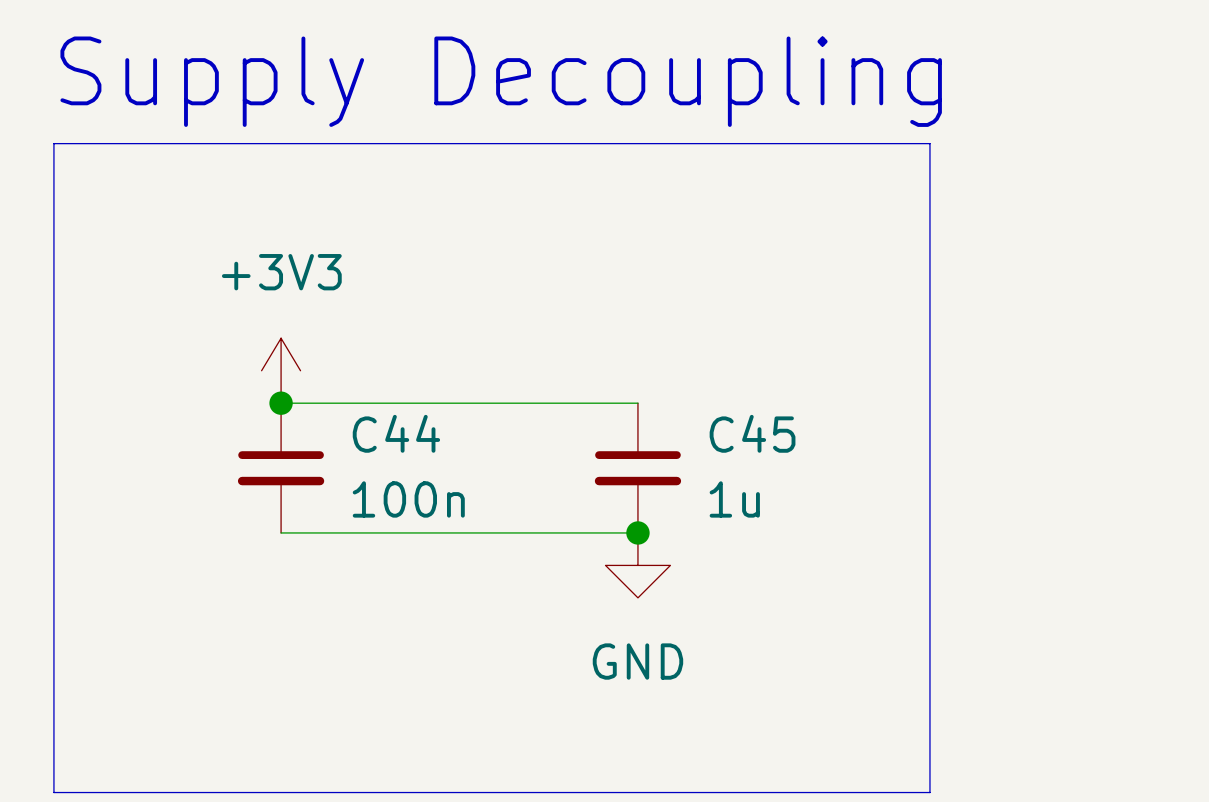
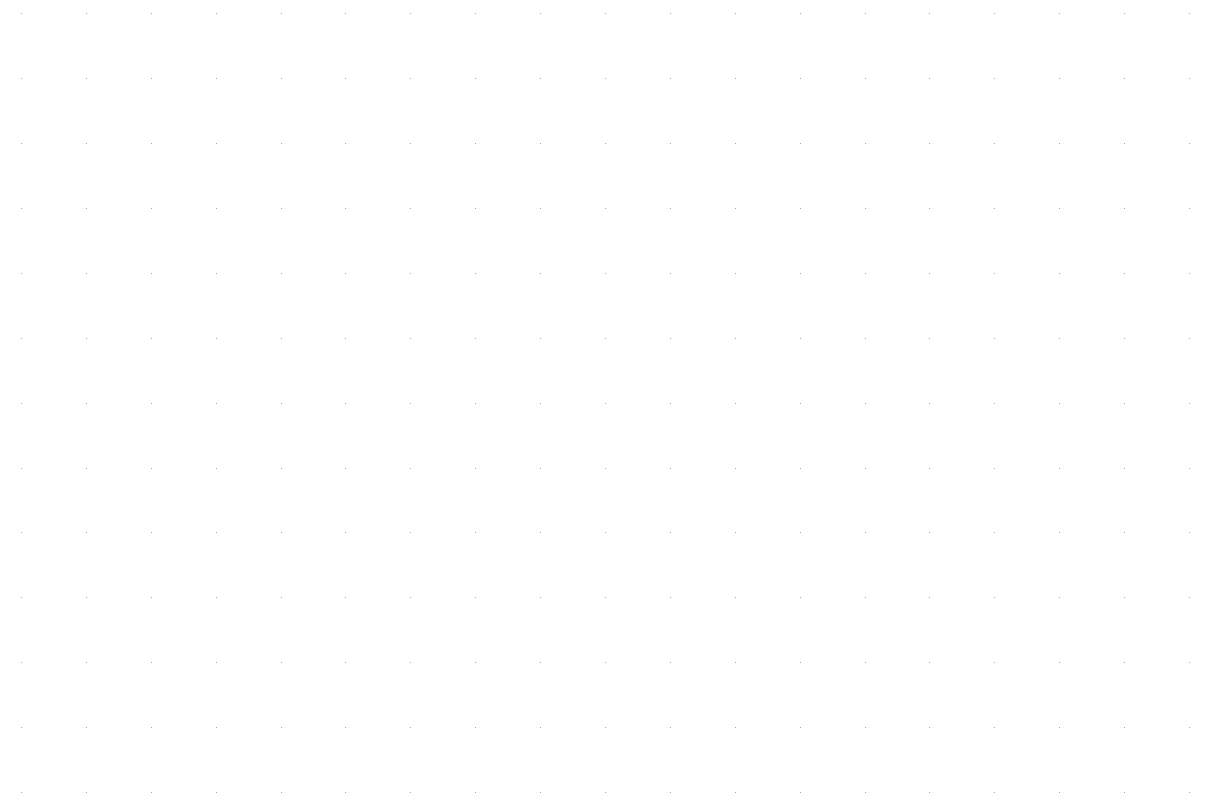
text: Supply Decoupling (501, 81) -> none
line: (53, 143) (929, 143) (929, 792) (53, 792) (53, 143) -> none
power symbol: +3V3 (281, 370) -> none
wire: (281, 403) (637, 403) -> none
junction: (281, 403) -> none
C44: 100n (281, 468) -> none
C45: 1u (637, 468) -> none
wire: (281, 532) (637, 532) -> none
junction: (637, 532) -> none
power symbol: GND (637, 565) -> none

